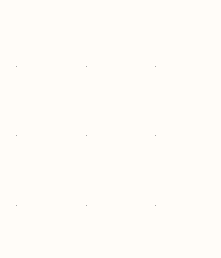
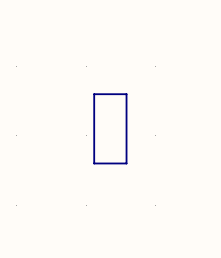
line: none -> (94, 94) (94, 163) (126, 163) (126, 94) (94, 94)

